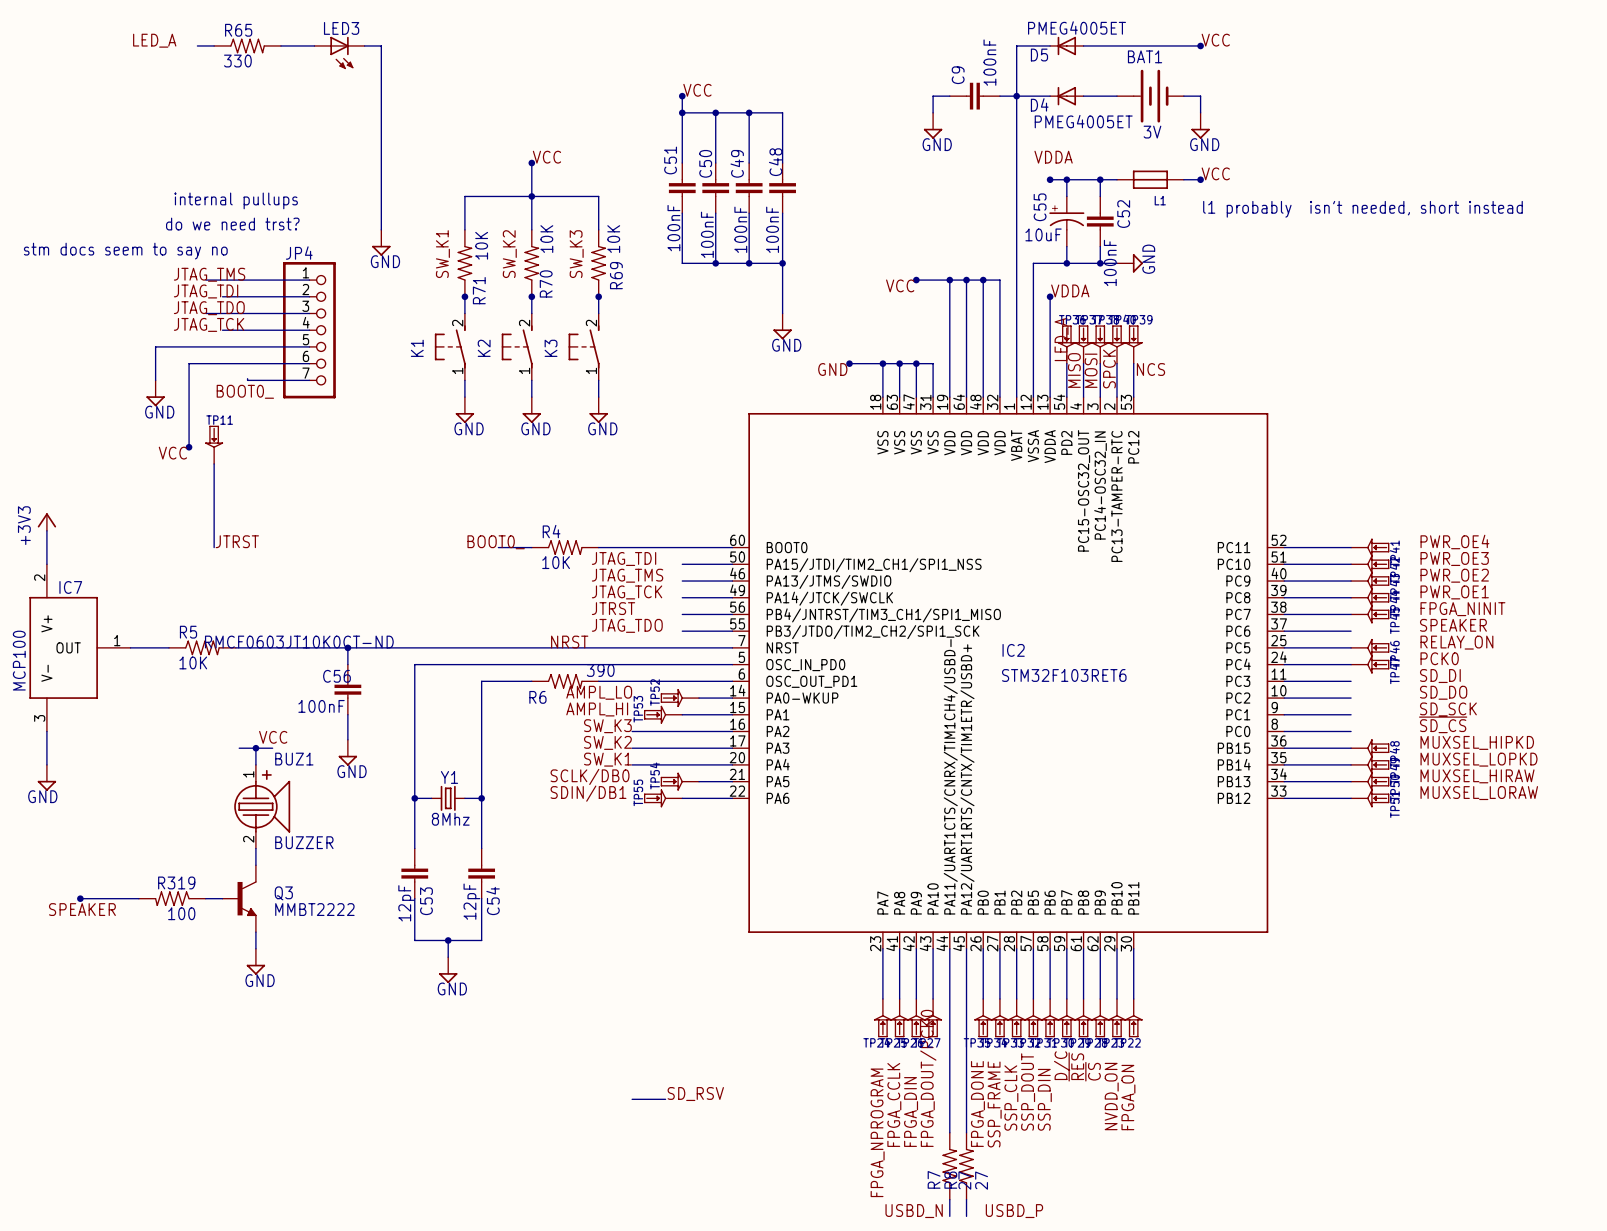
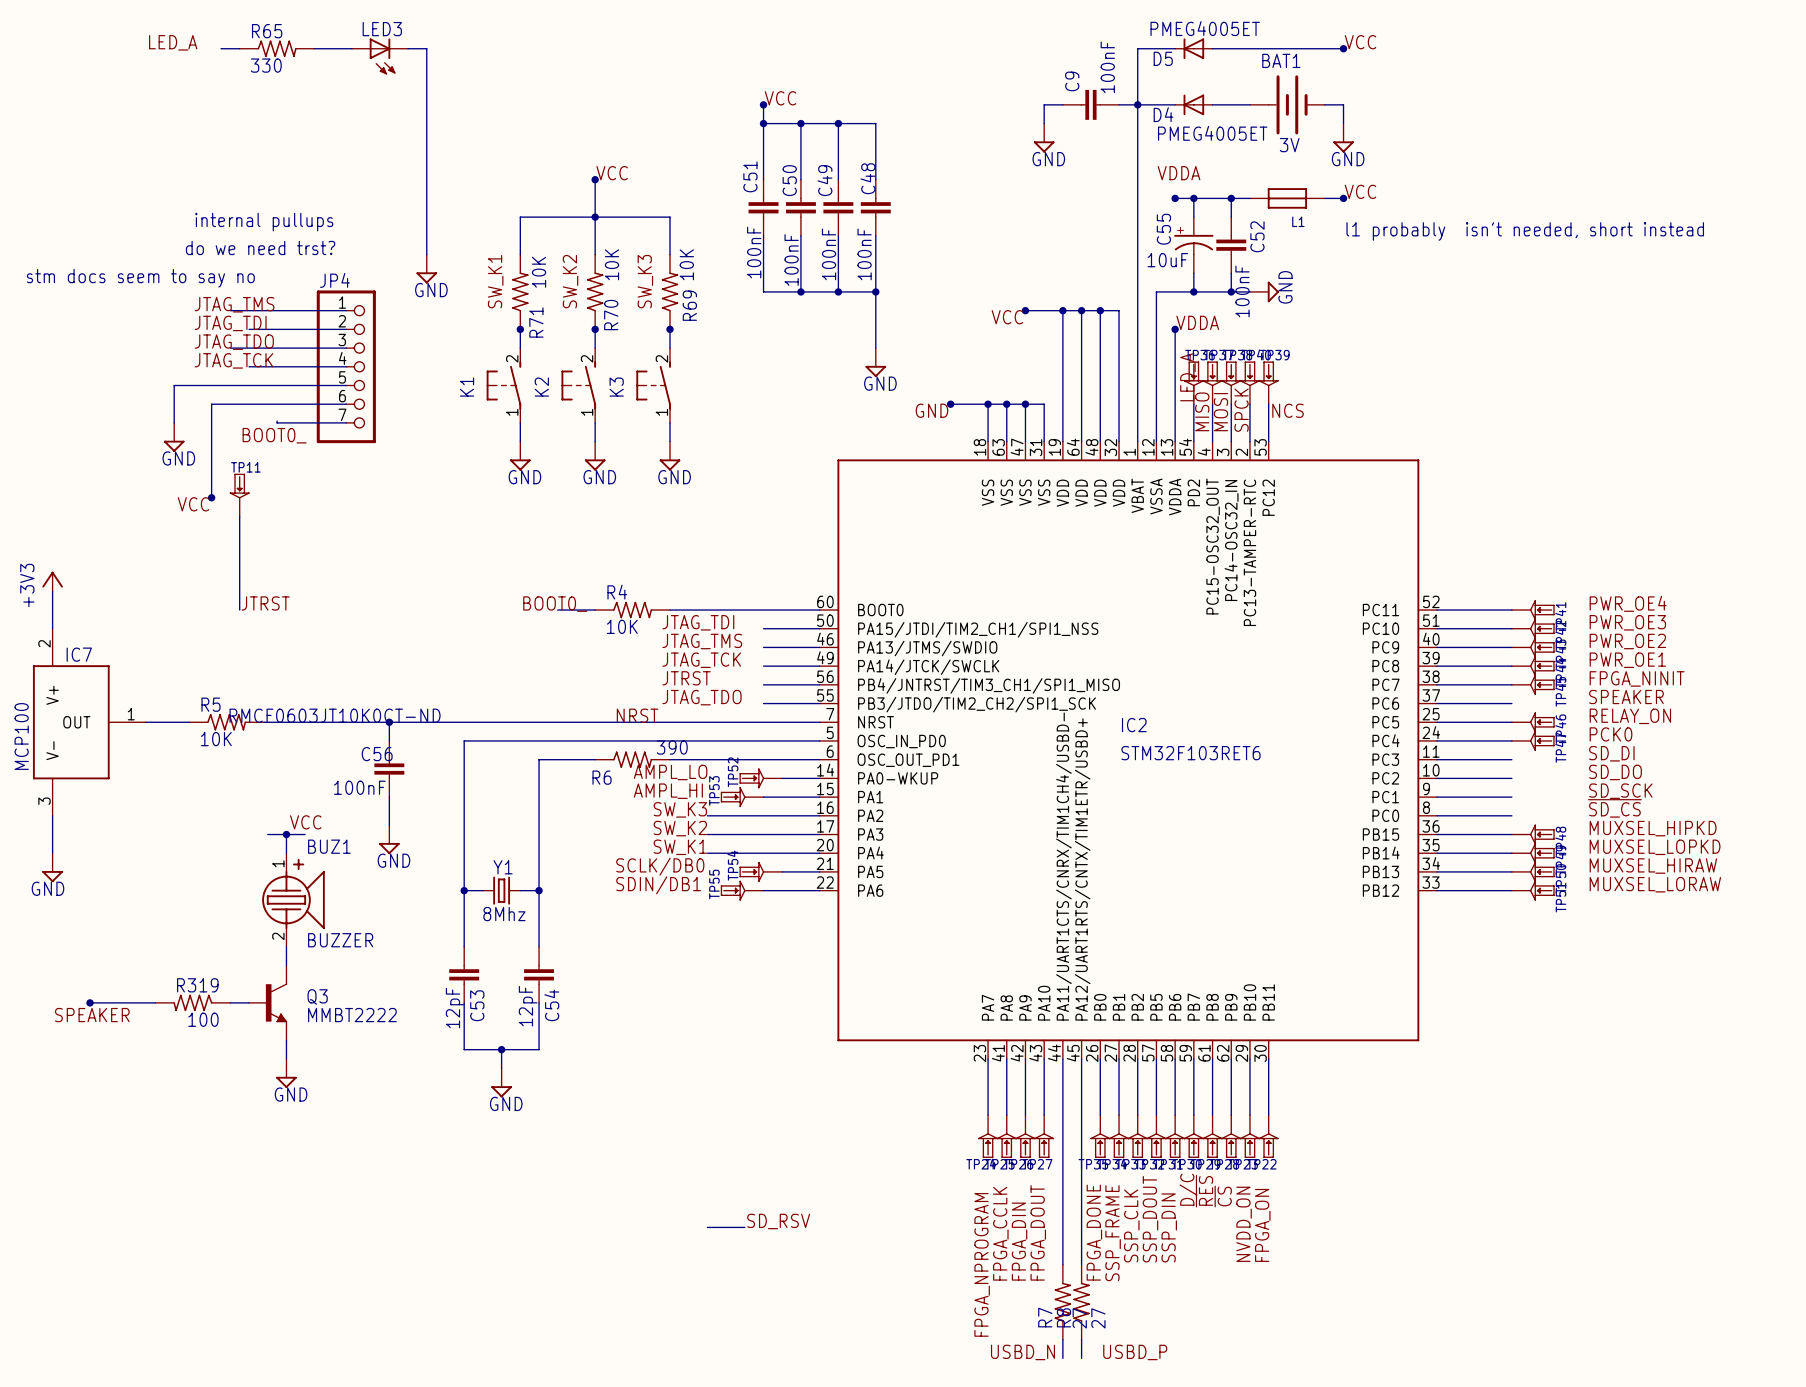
label: FPGA_DOUT/PCK0 (928, 1078) -> FPGA_DOUT (1038, 1232)

